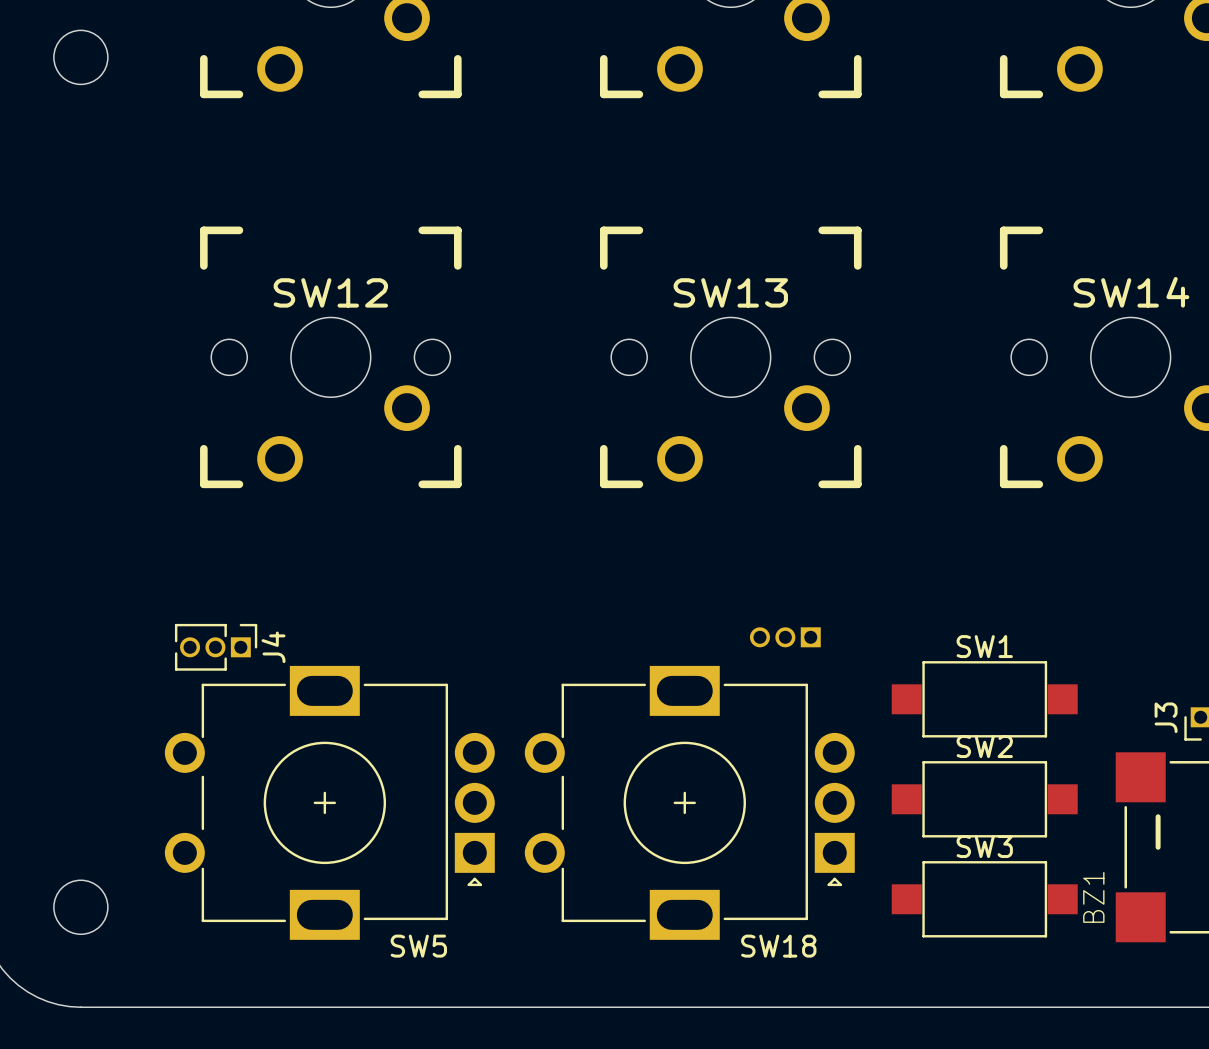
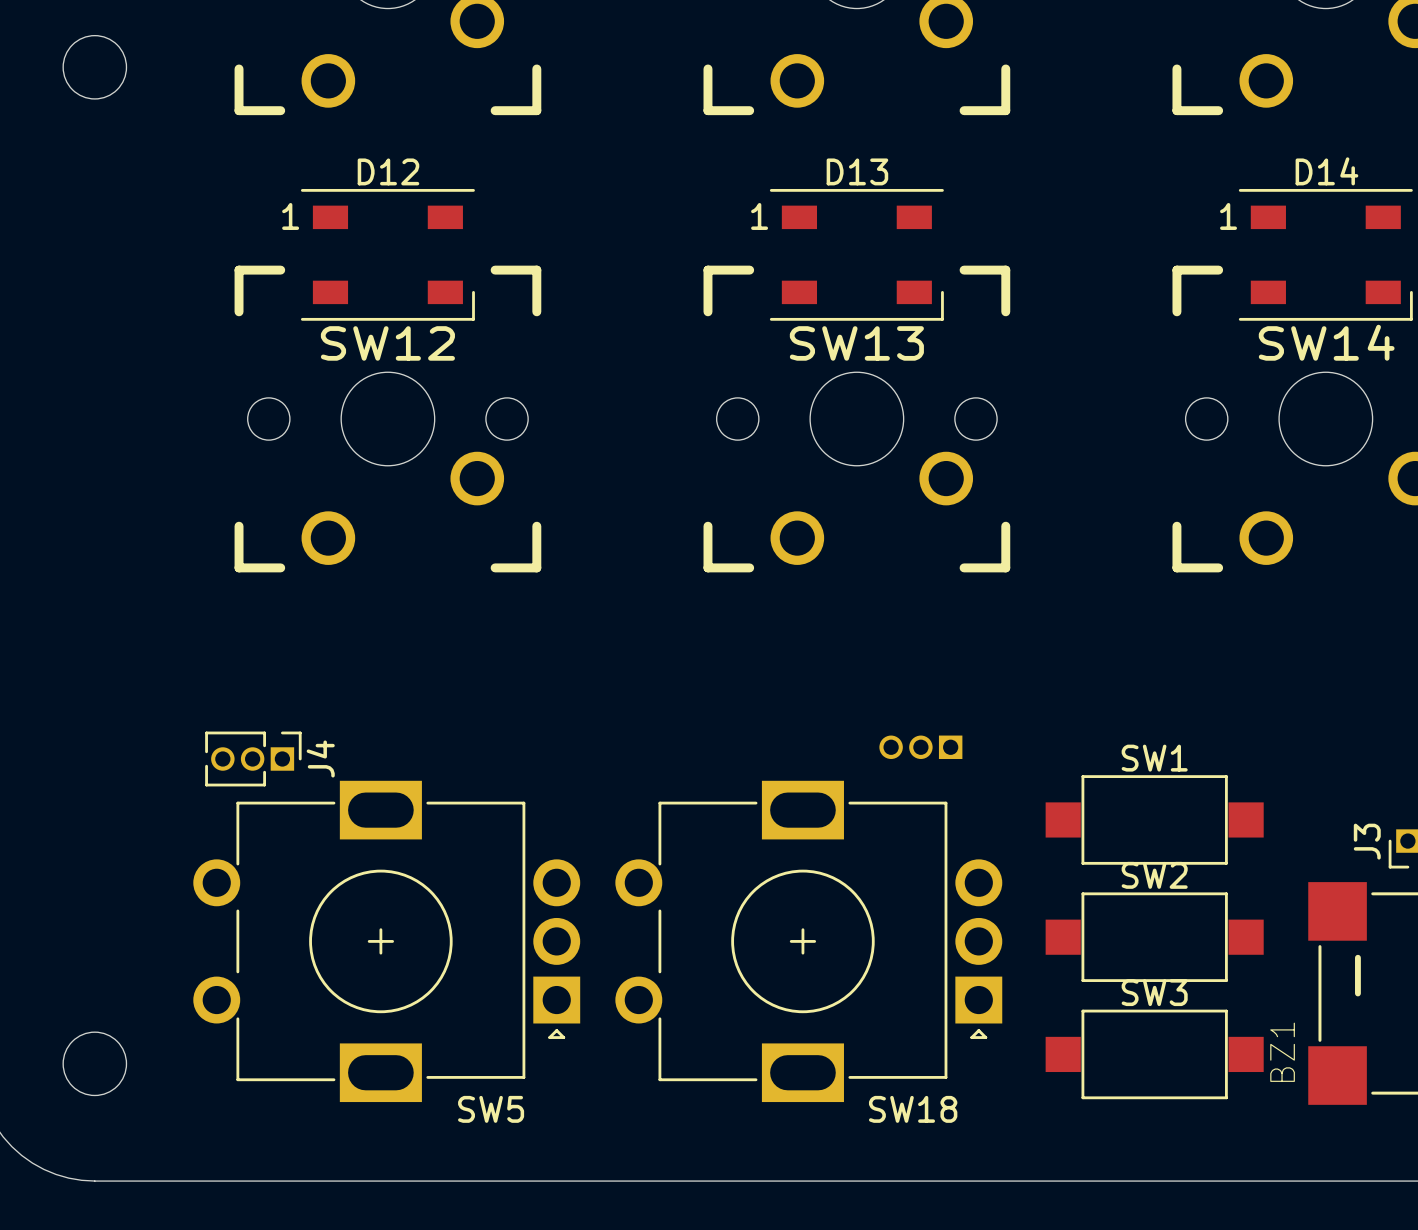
D12: none -> (387, 254)
D13: none -> (856, 254)
D14: none -> (1325, 254)

